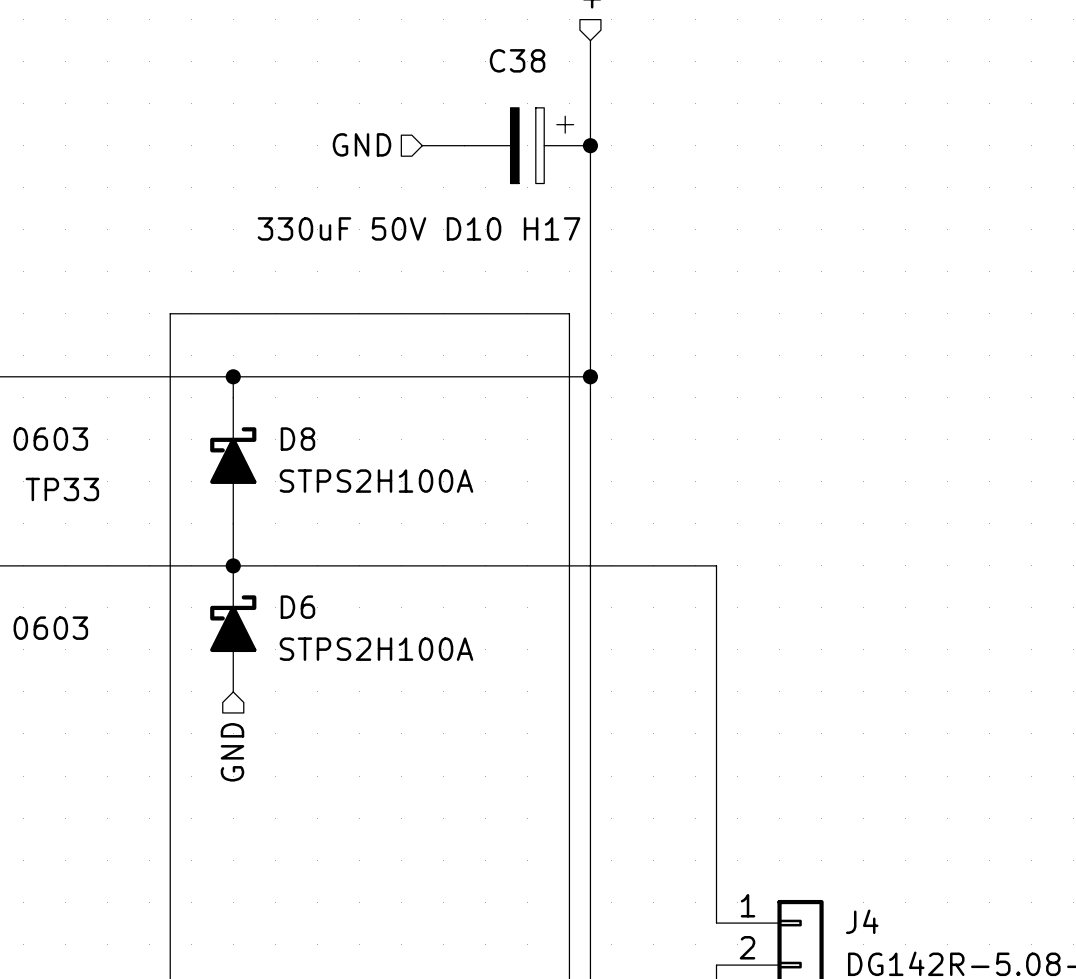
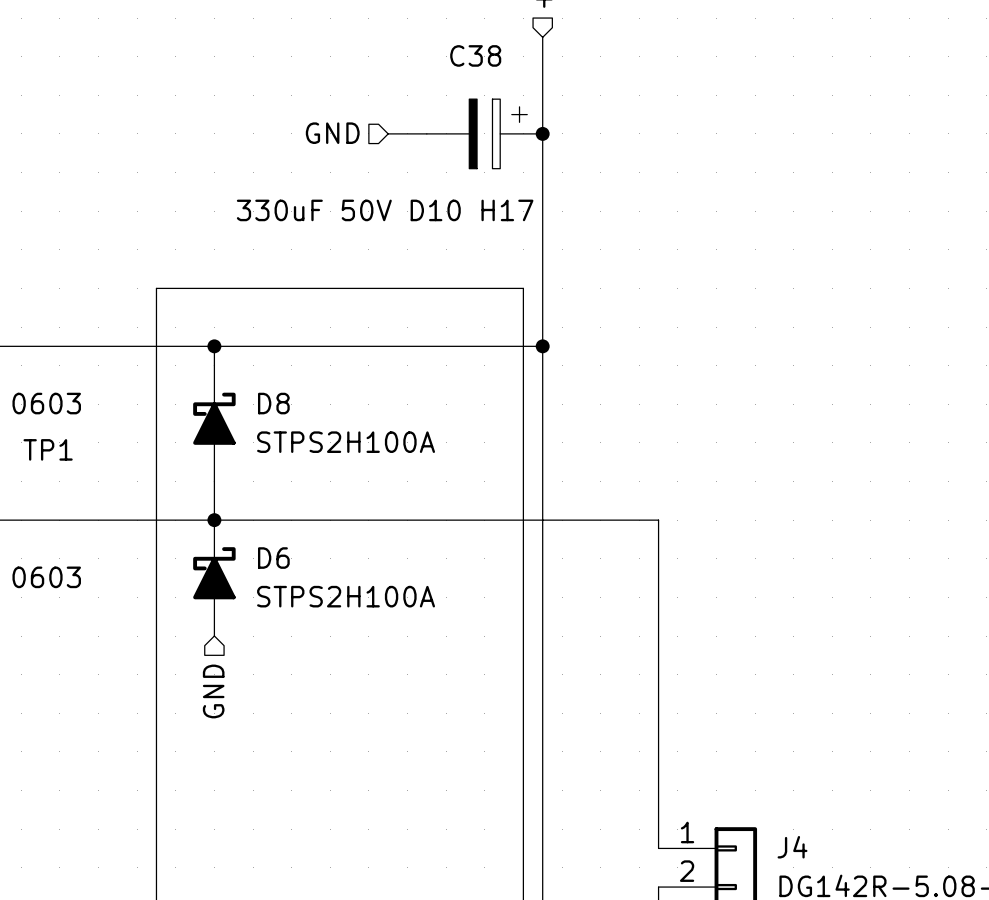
TP33 name: TP33 (62, 489) -> TP1 (48, 449)

